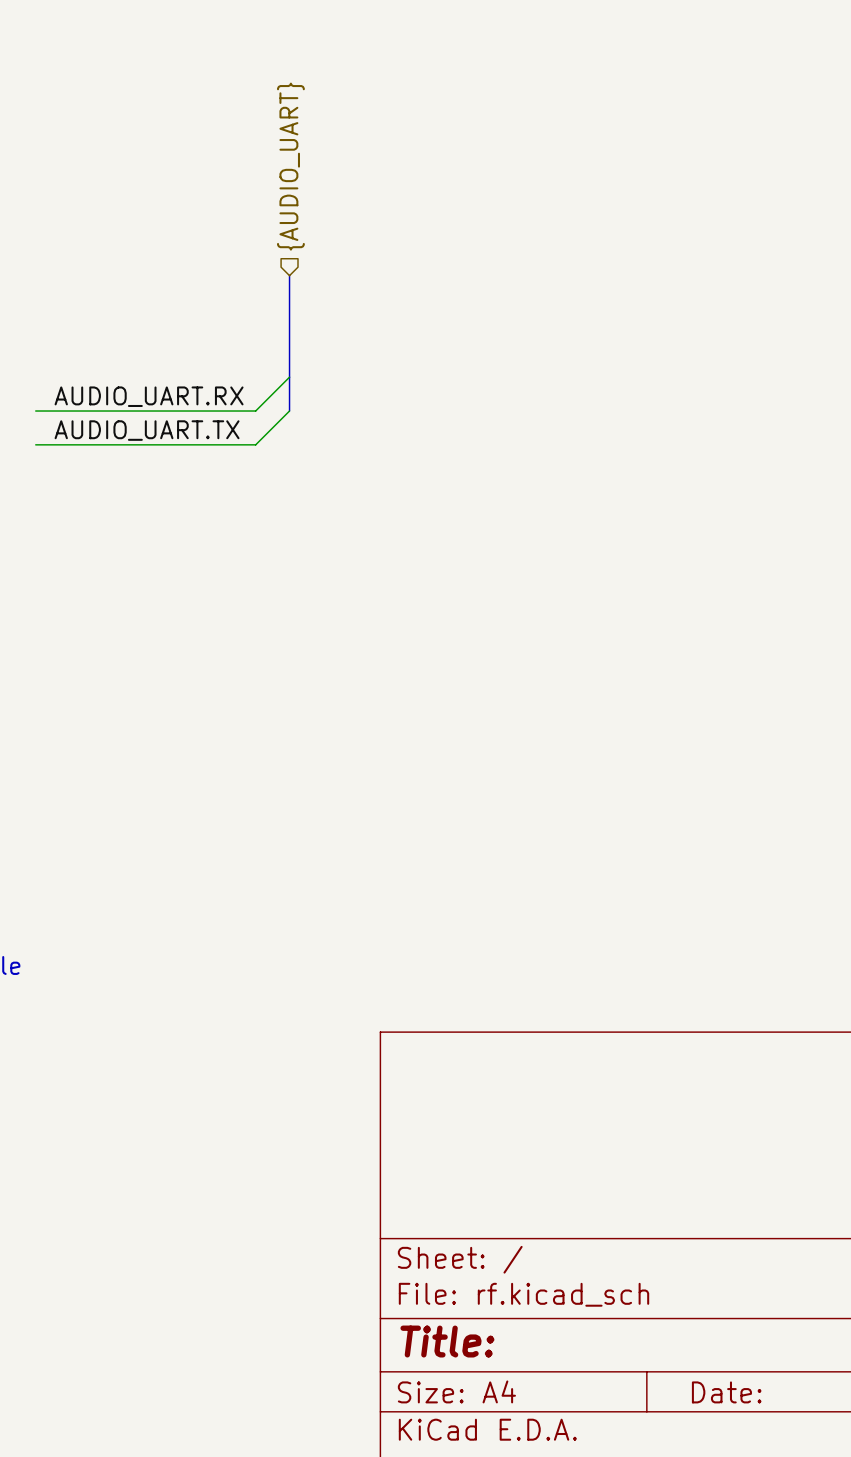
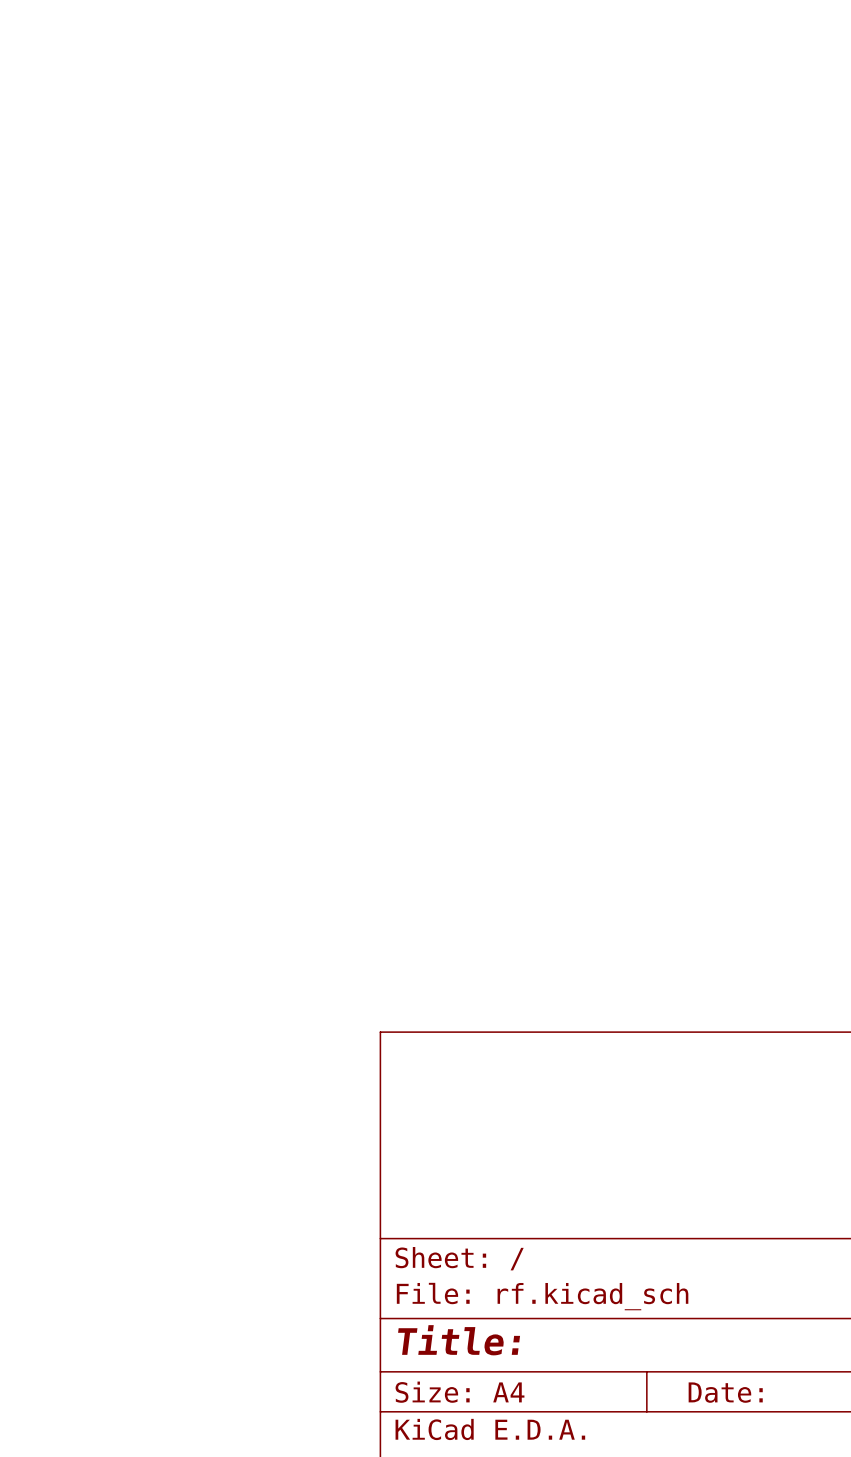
hierarchical label: {AUDIO_UART} (290, 166) -> none
bus: (289, 275) (289, 411) -> none
wire: (289, 377) (255, 411) (35, 411) -> none
label: AUDIO_UART.RX (149, 396) -> none
wire: (289, 411) (255, 444) (35, 444) -> none
label: AUDIO_UART.TX (147, 430) -> none

